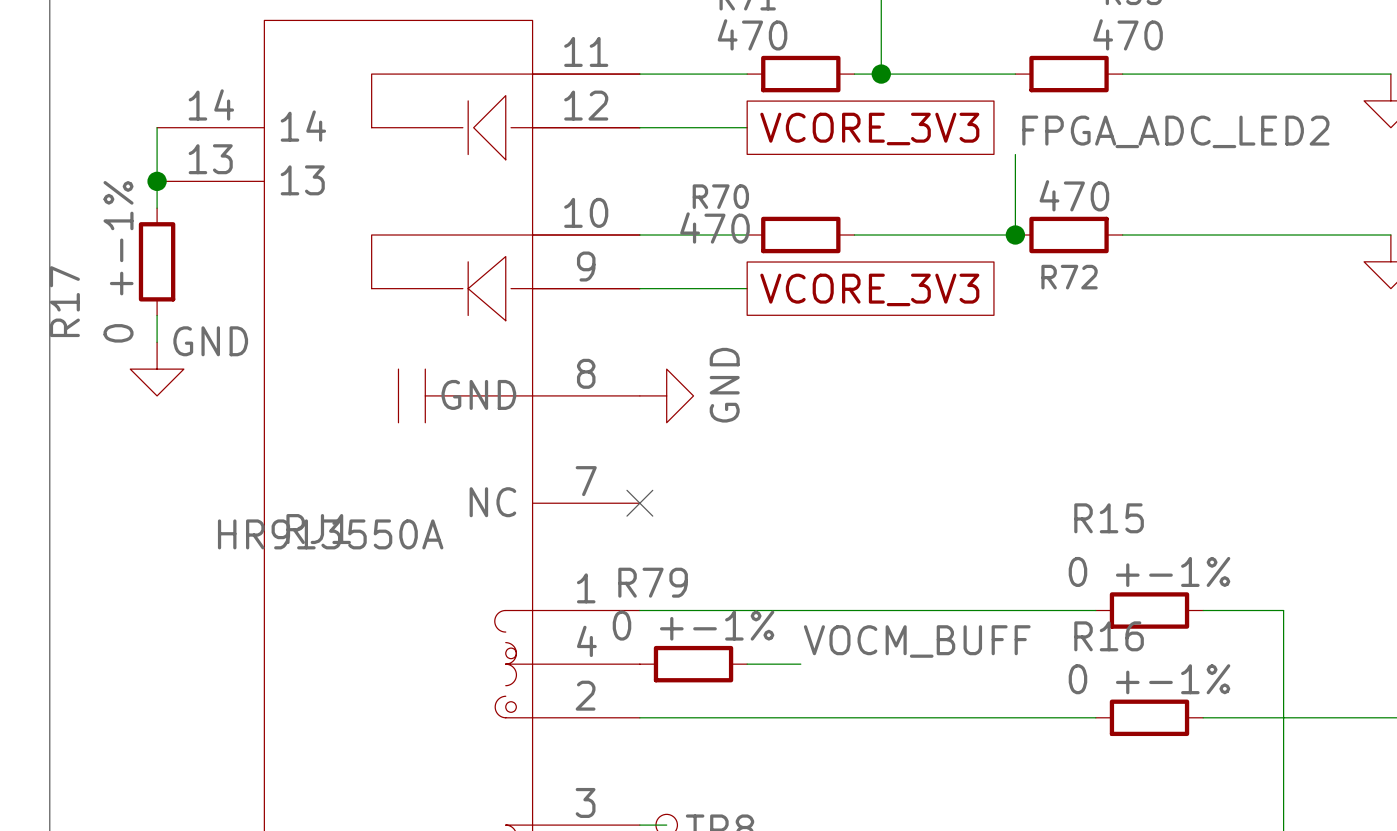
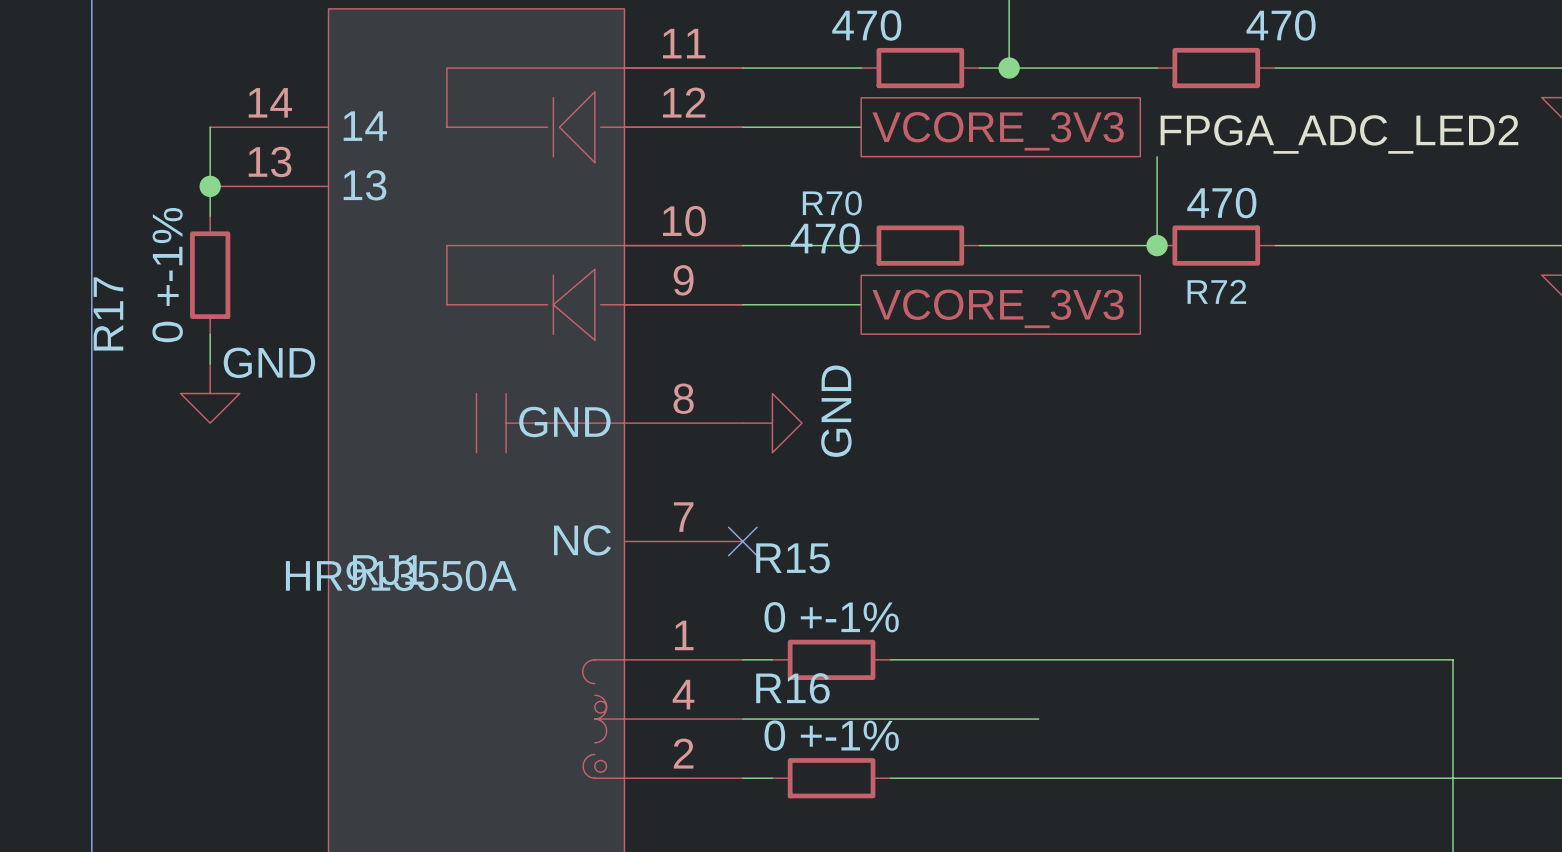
wire: (666, 610) (773, 610) -> (742, 719) (861, 719)
wire: none -> (1245, 659) (1364, 659)
R15 position: (1149, 610) -> (831, 659)
label: VOCM_BUFF (917, 641) -> none
R79: 0 +-1% (693, 664) -> none
wire: (666, 717) (773, 717) -> (920, 719) (1038, 719)
wire: none -> (1245, 778) (1364, 778)
R16 position: (1149, 717) -> (831, 778)

